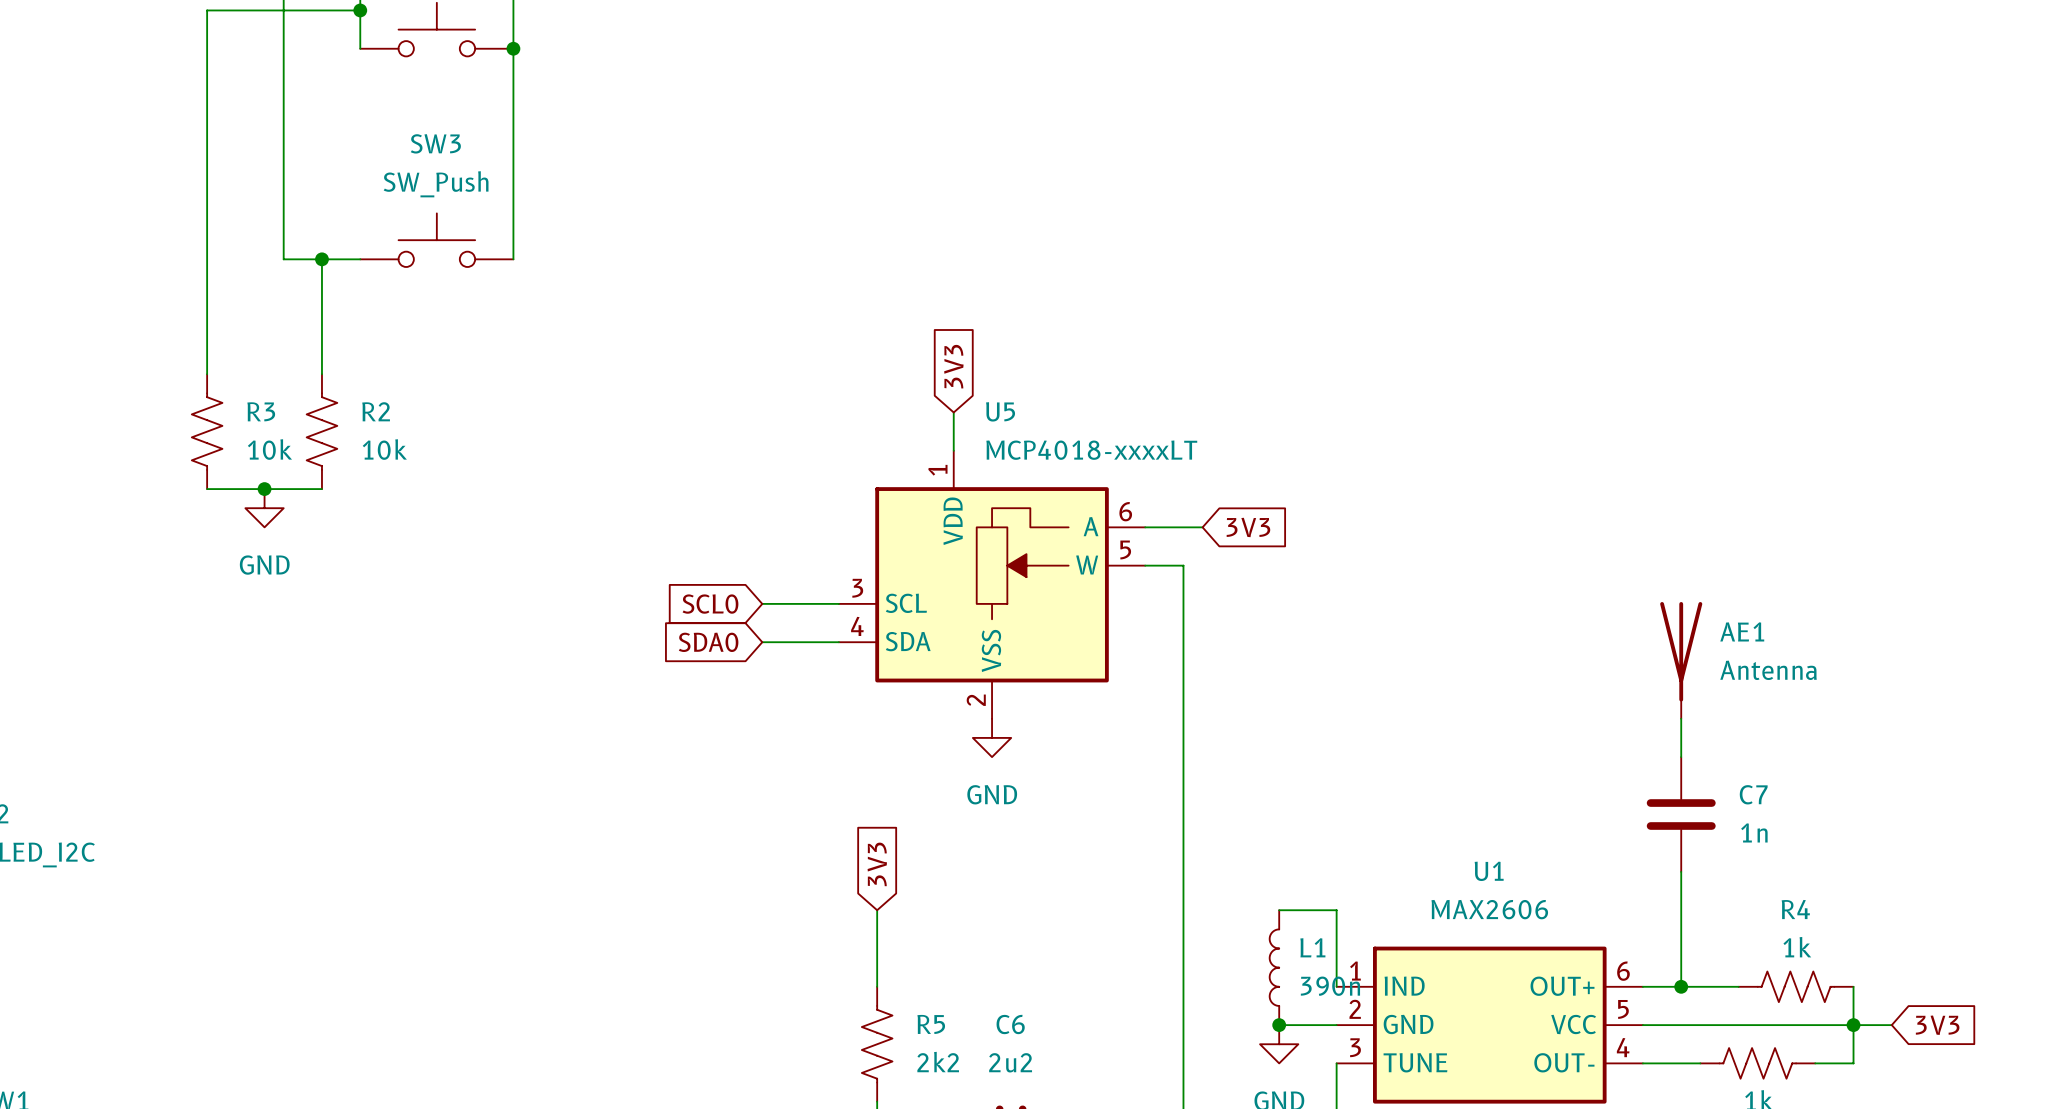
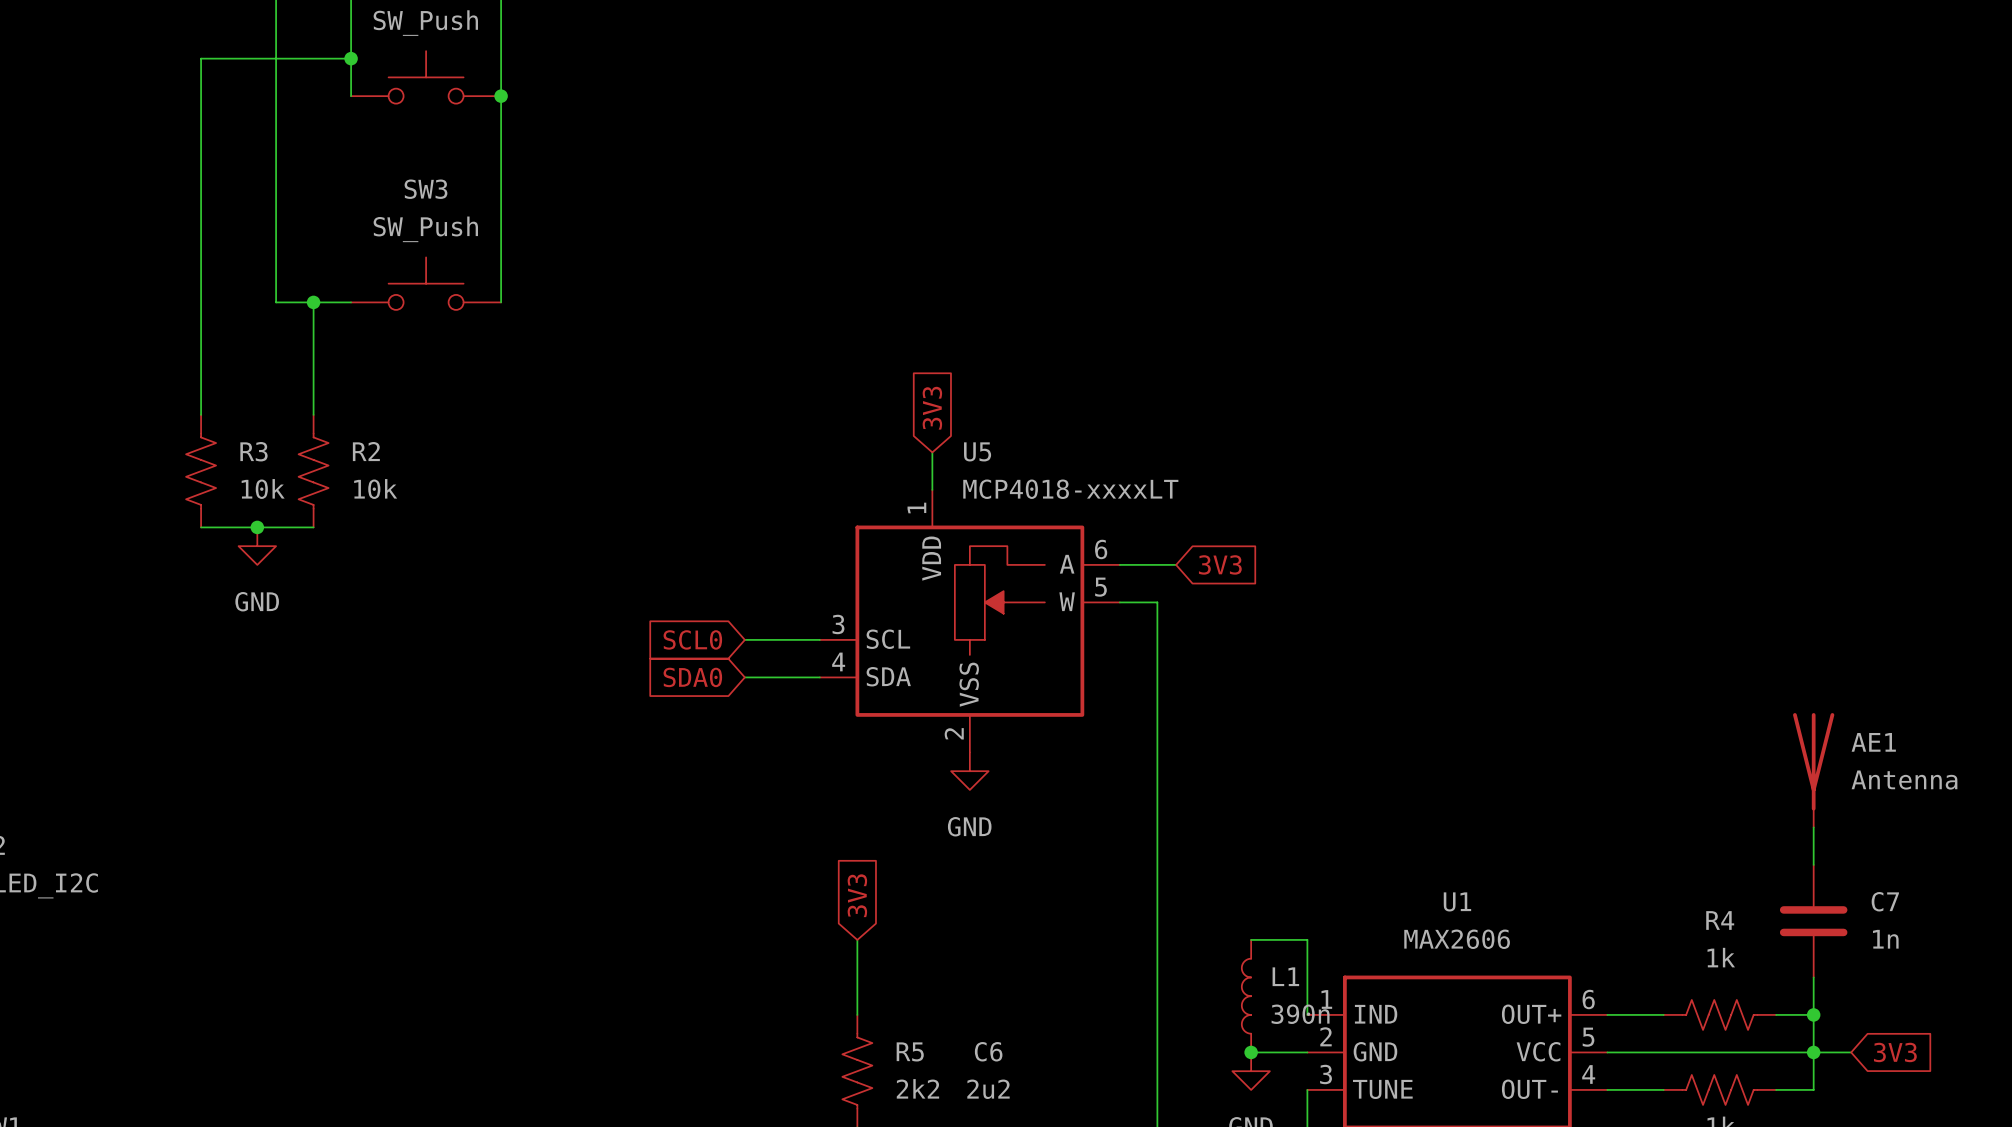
AE1 position: (1681, 660) -> (1813, 770)
wire: (1681, 718) (1681, 757) -> (1813, 827) (1813, 864)
C7 position: (1681, 814) -> (1813, 921)
wire: (1681, 871) (1681, 986) -> none
R4 name position: R4 (1795, 909) -> R4 (1720, 920)
R4 value position: 1k (1797, 947) -> 1k (1721, 957)
wire: none -> (1813, 977) (1813, 1014) (1776, 1014)
junction: (1681, 986) -> none
R4 position: (1796, 986) -> (1719, 1014)
junction: none -> (1813, 1014)

